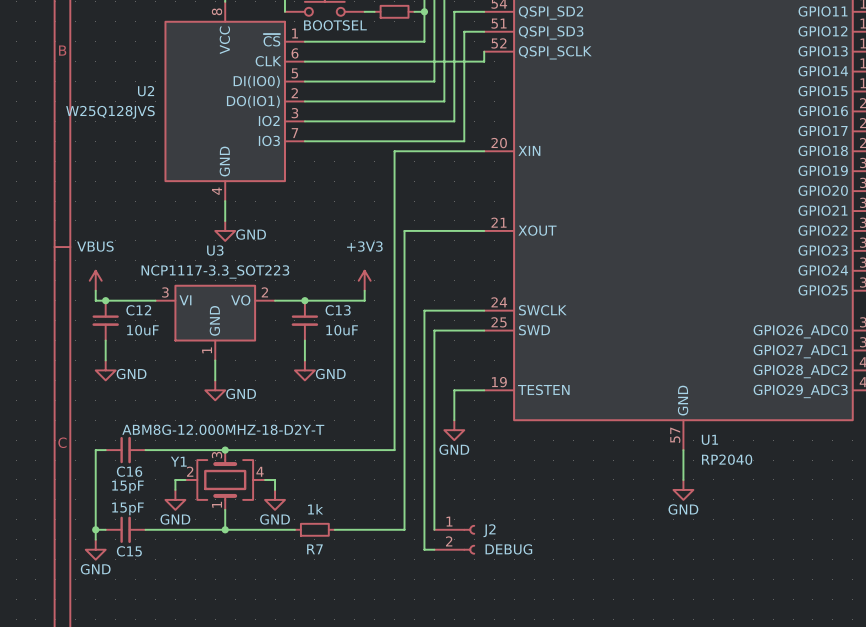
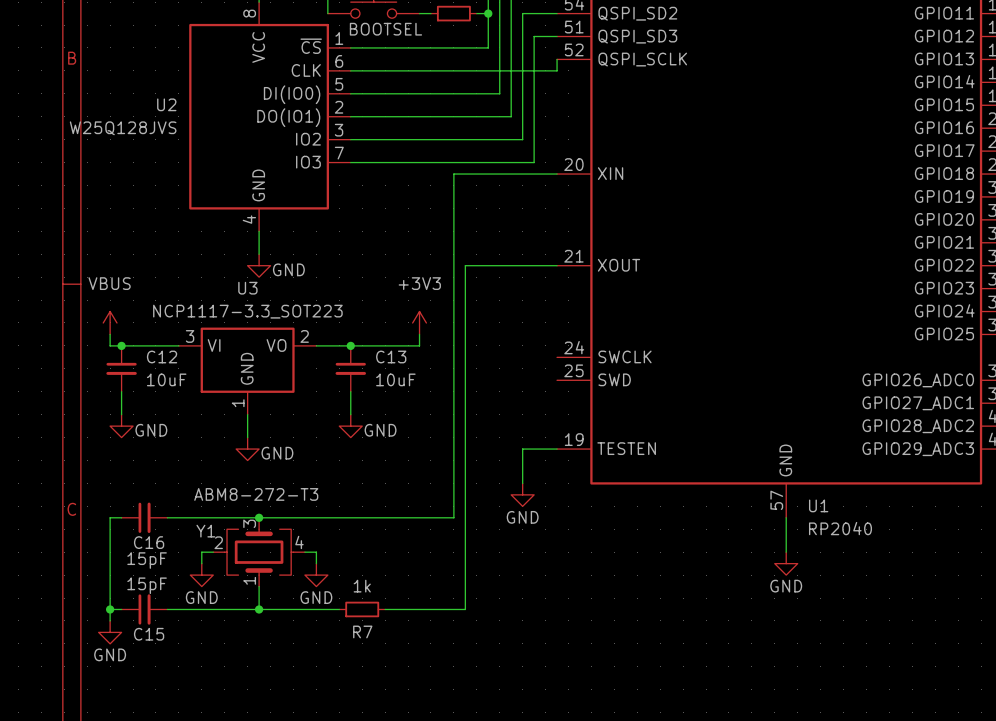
wire: (484, 310) (424, 310) (424, 549) (434, 549) -> none
wire: (484, 330) (434, 330) (434, 529) -> none
Y1 value: ABM8G-12.000MHZ-18-D2Y-T (223, 429) -> ABM8-272-T3 (256, 494)
J2: DEBUG (454, 539) -> none

